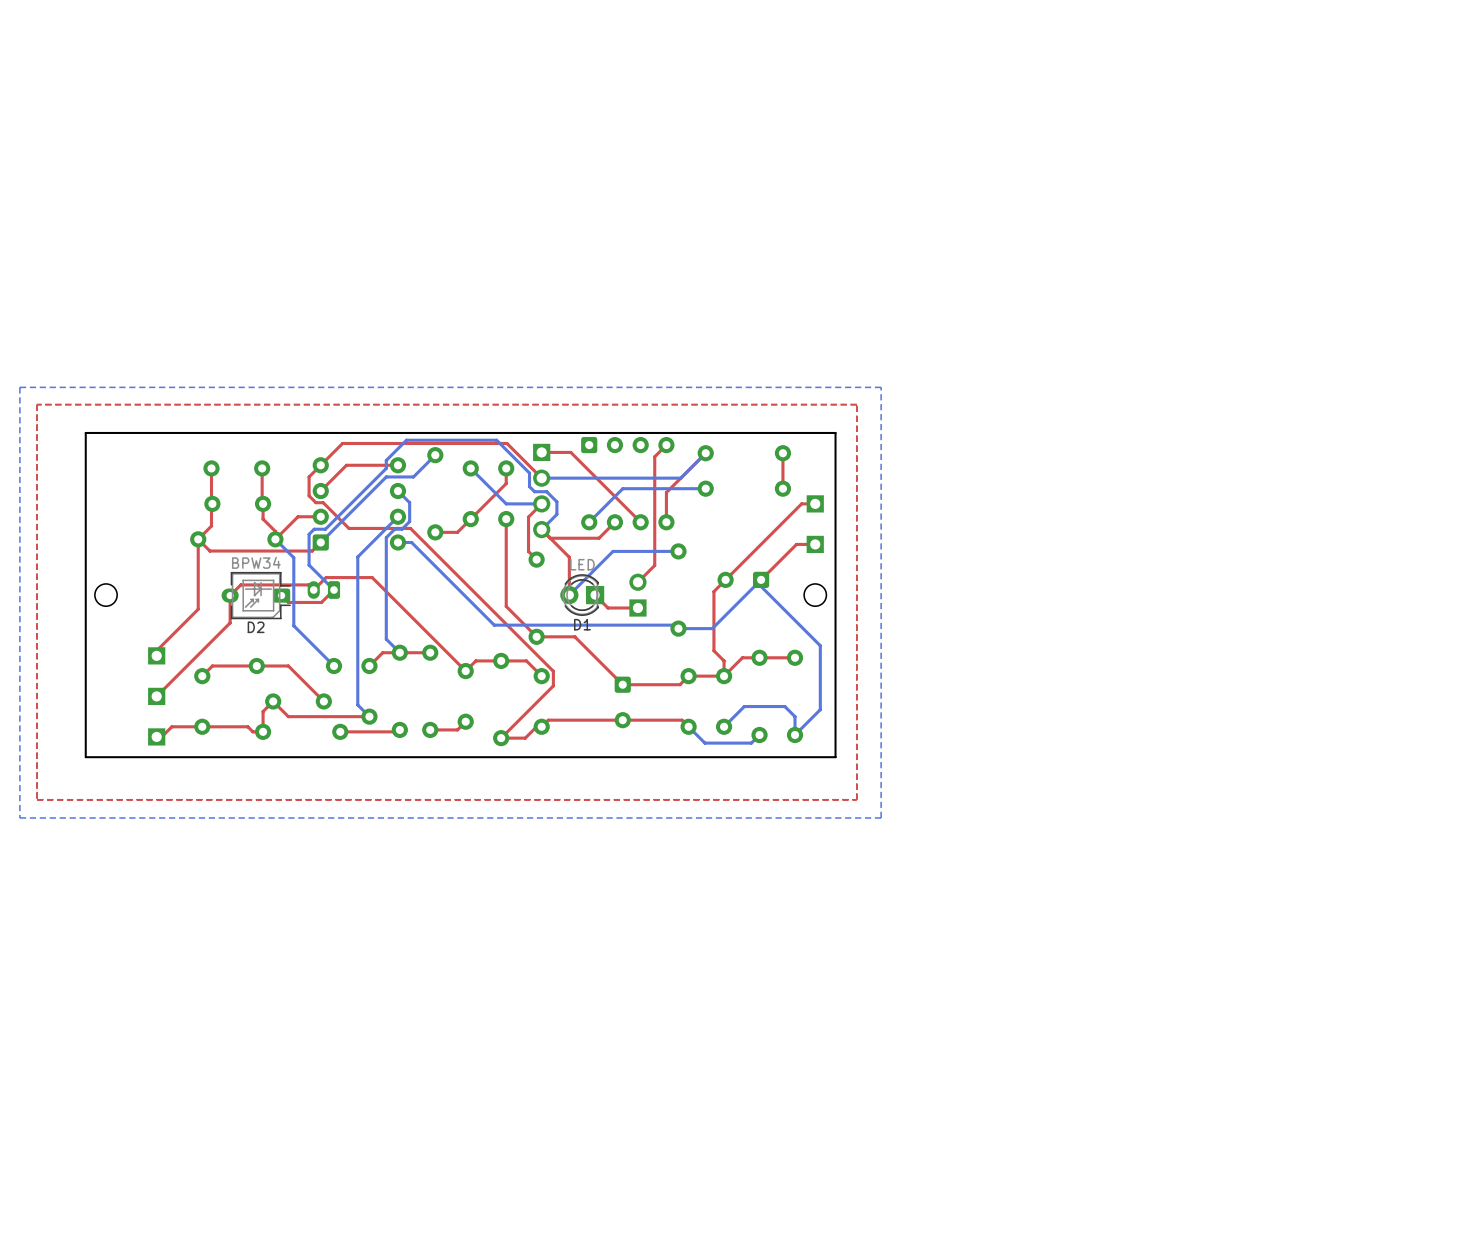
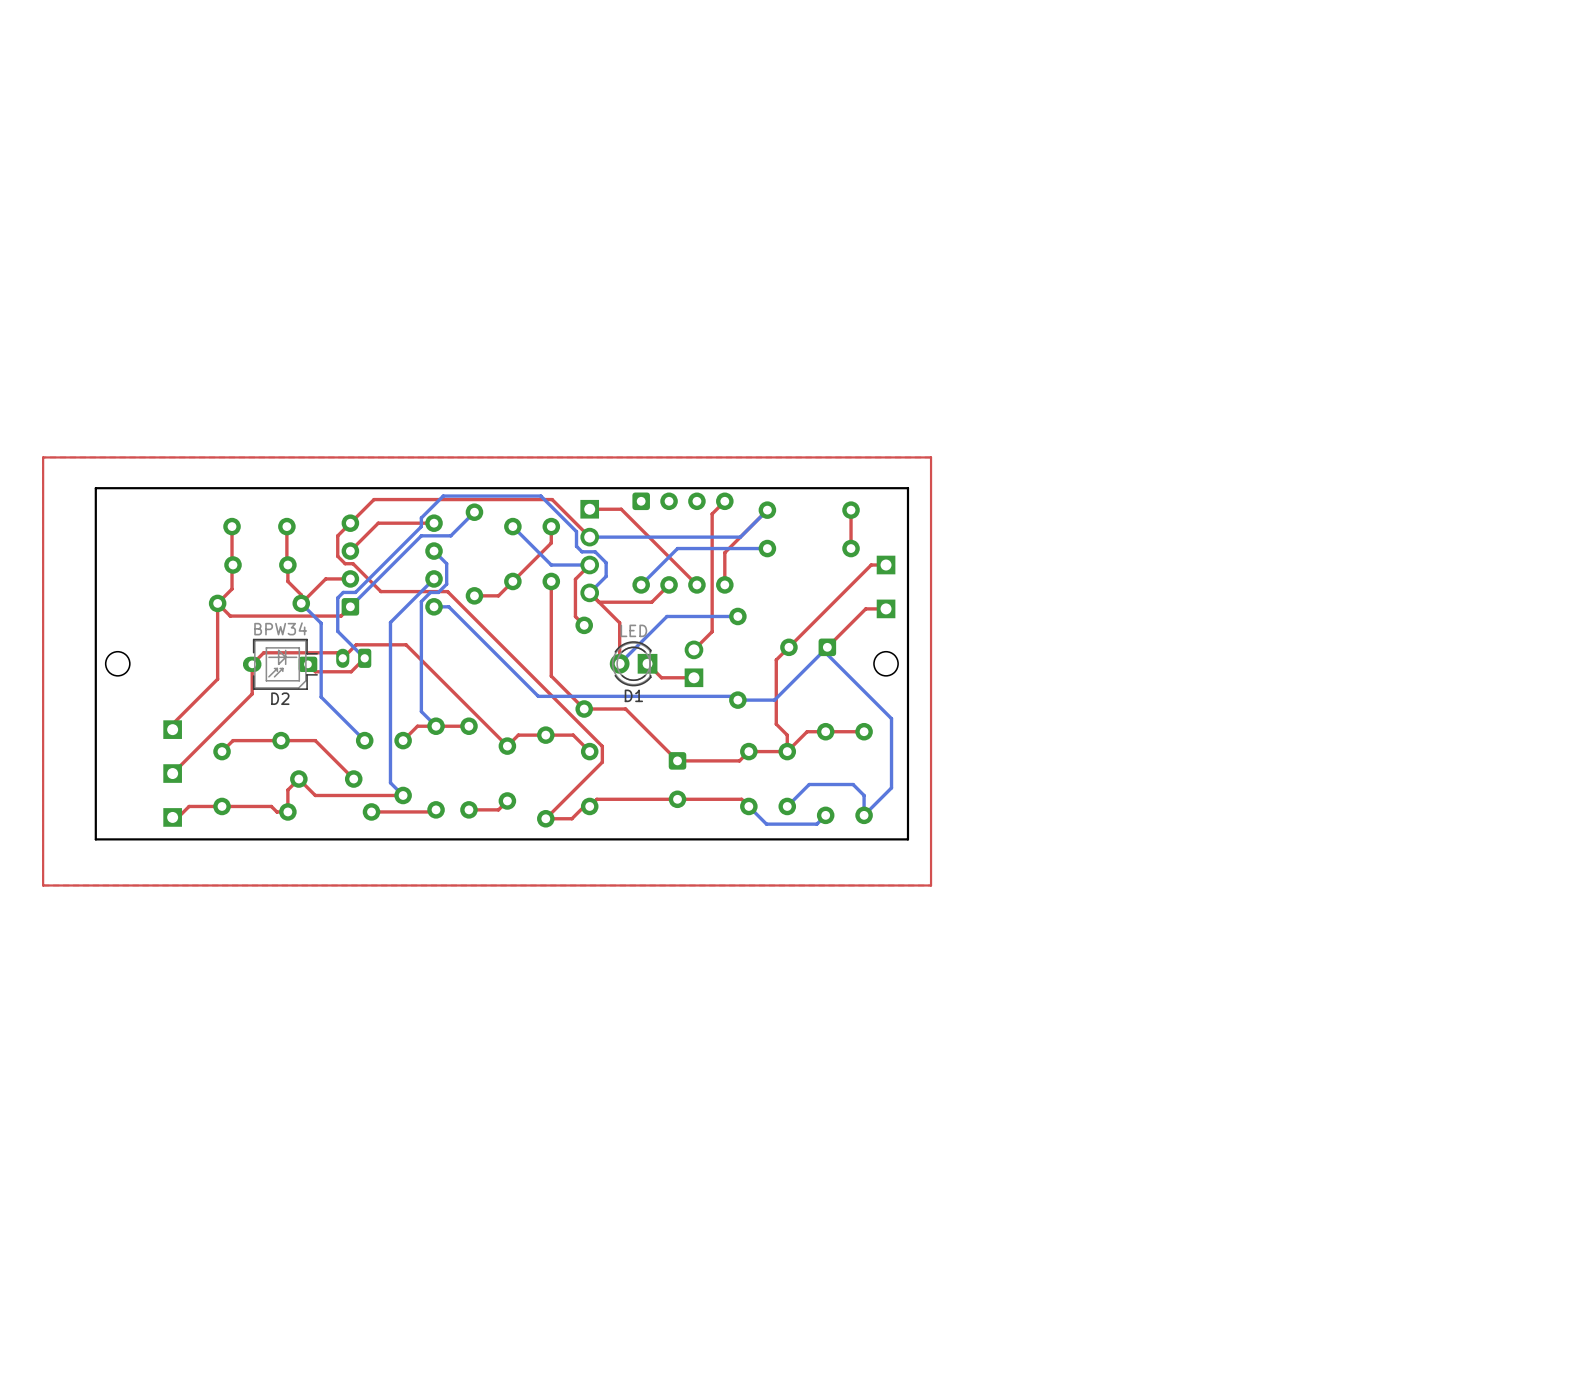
bottom zone outline: (881, 387) (19, 387) (19, 817) (881, 817) (881, 387) -> none
top track: none -> (931, 457) (43, 457) (43, 885) (931, 885) (931, 457)

